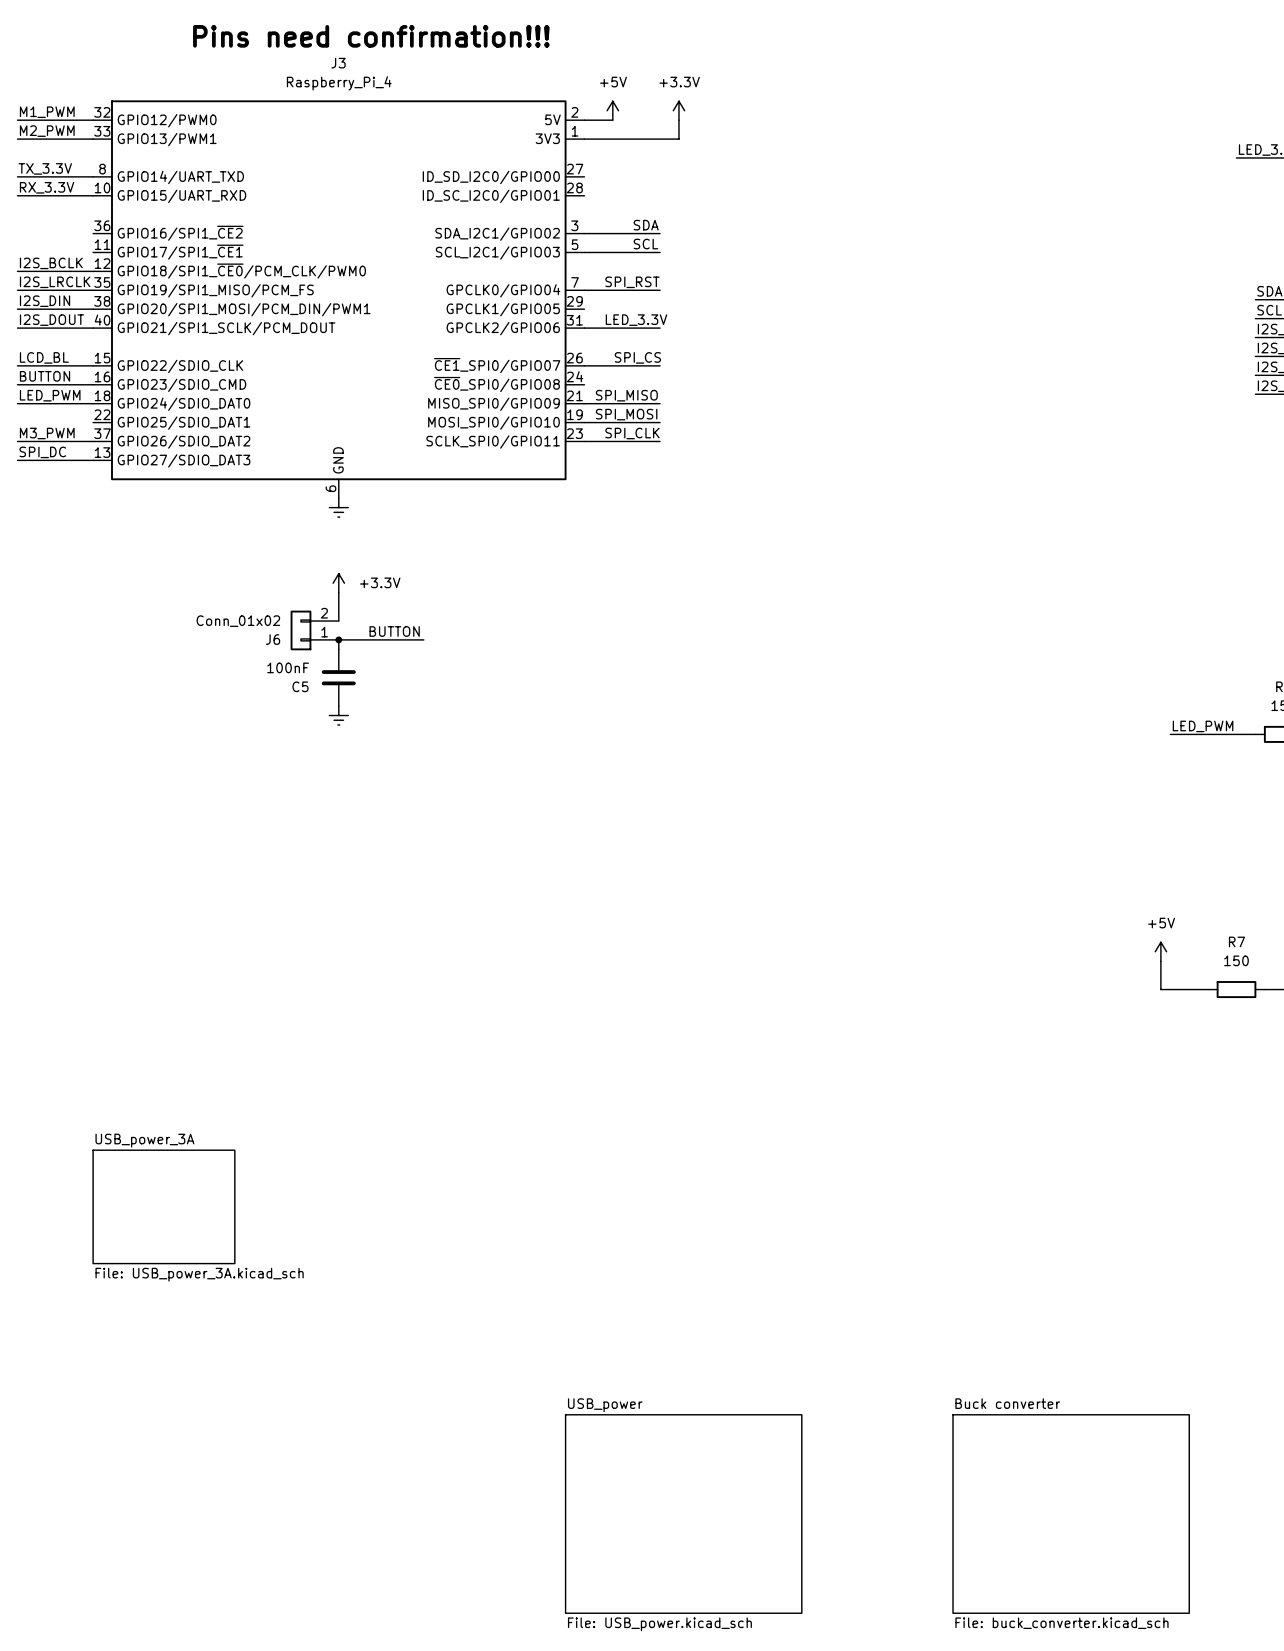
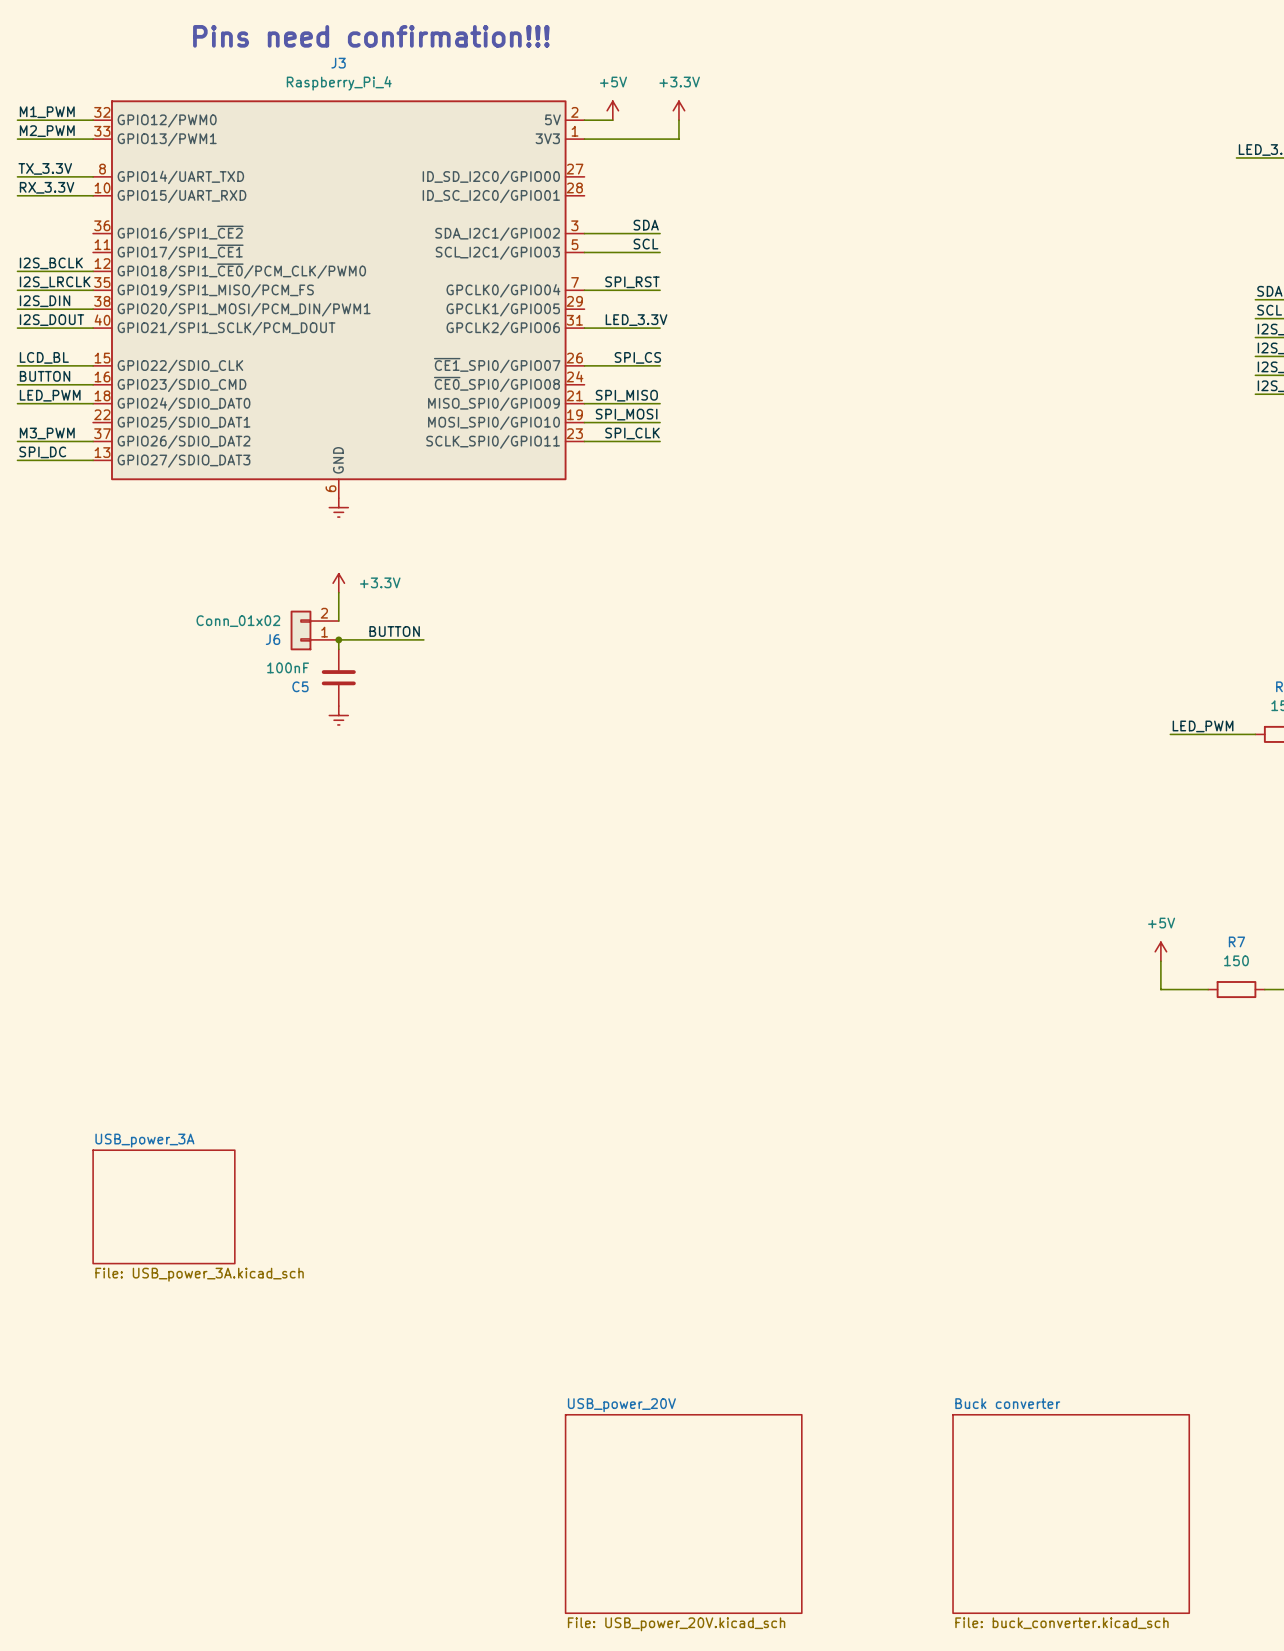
sheet USB_power name: USB_power (605, 1405) -> USB_power_20V (621, 1405)
sheet USB_power value: File: USB_power.kicad_sch (659, 1624) -> File: USB_power_20V.kicad_sch (676, 1624)

